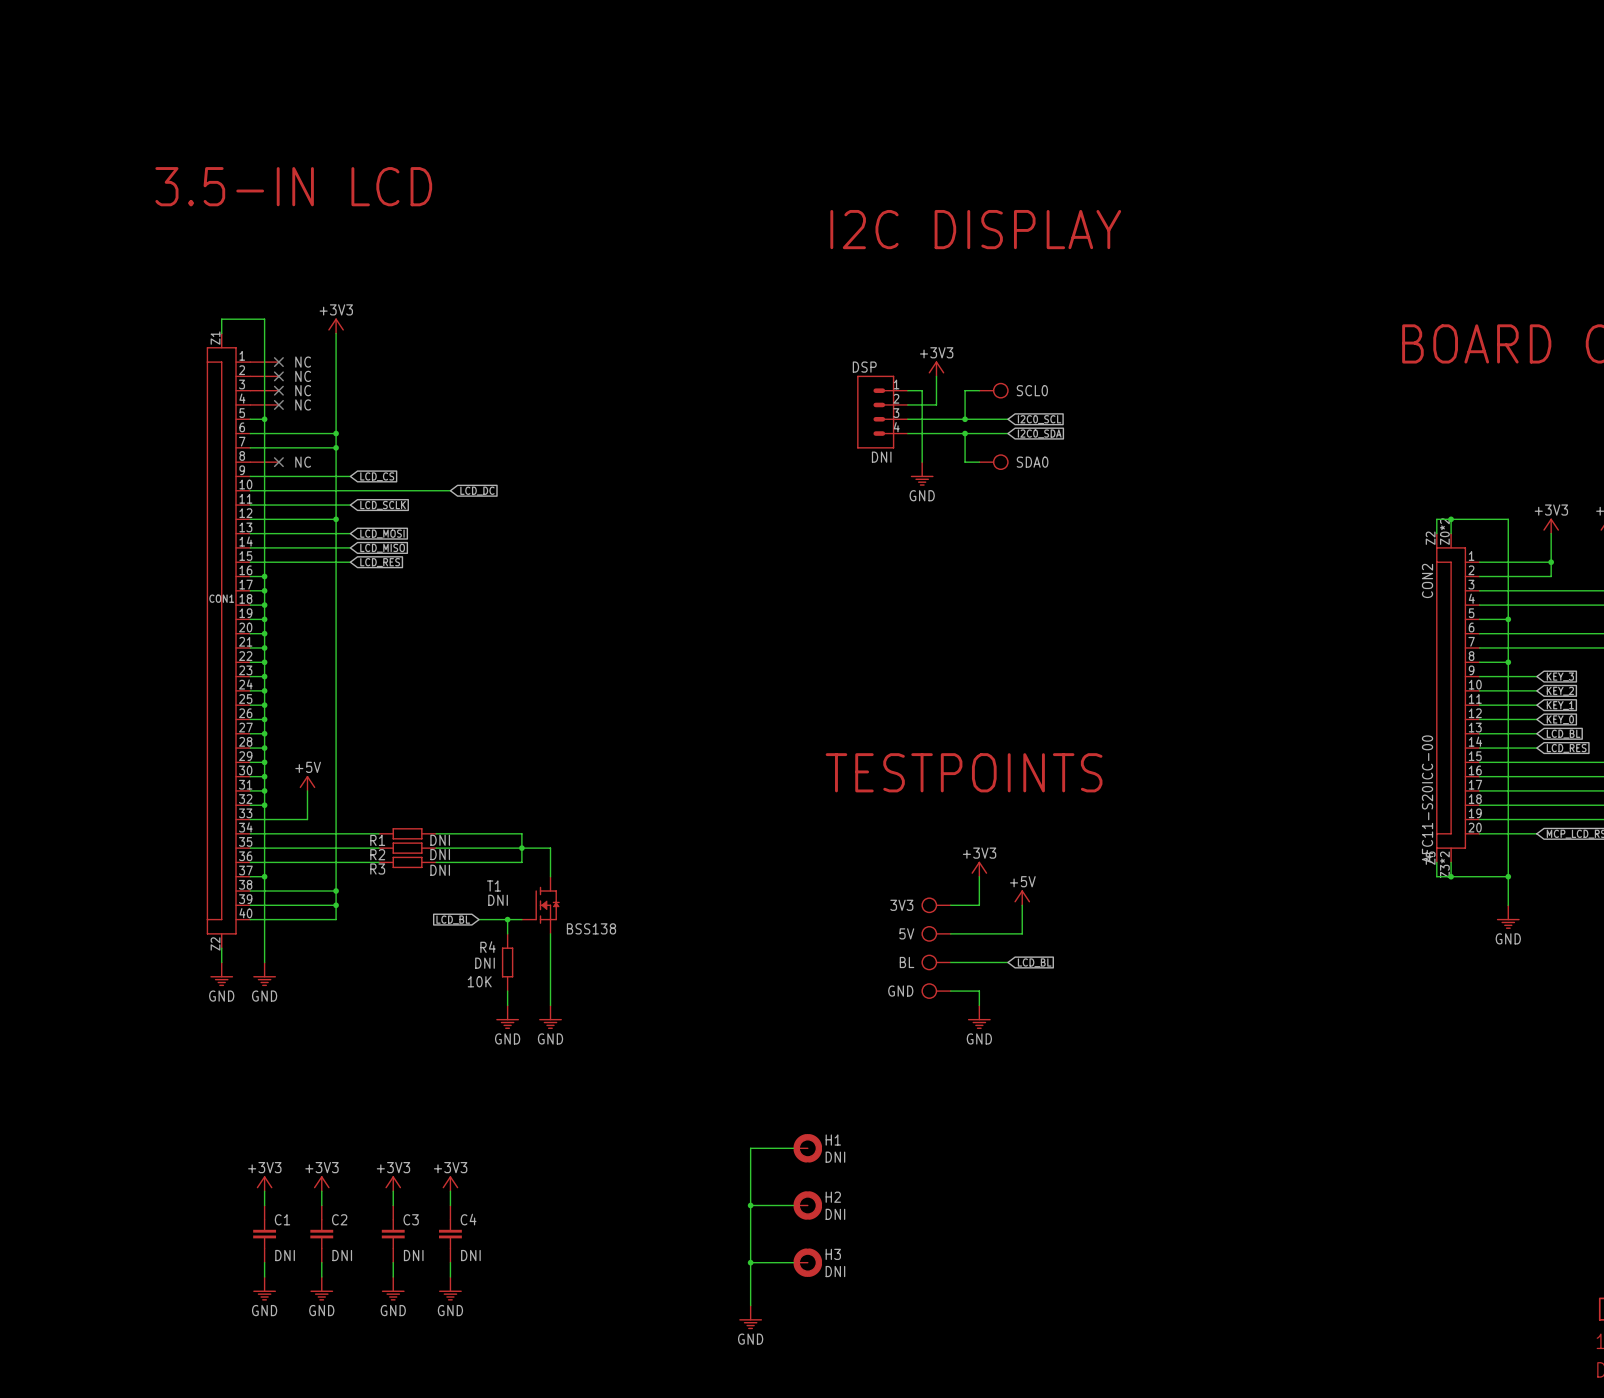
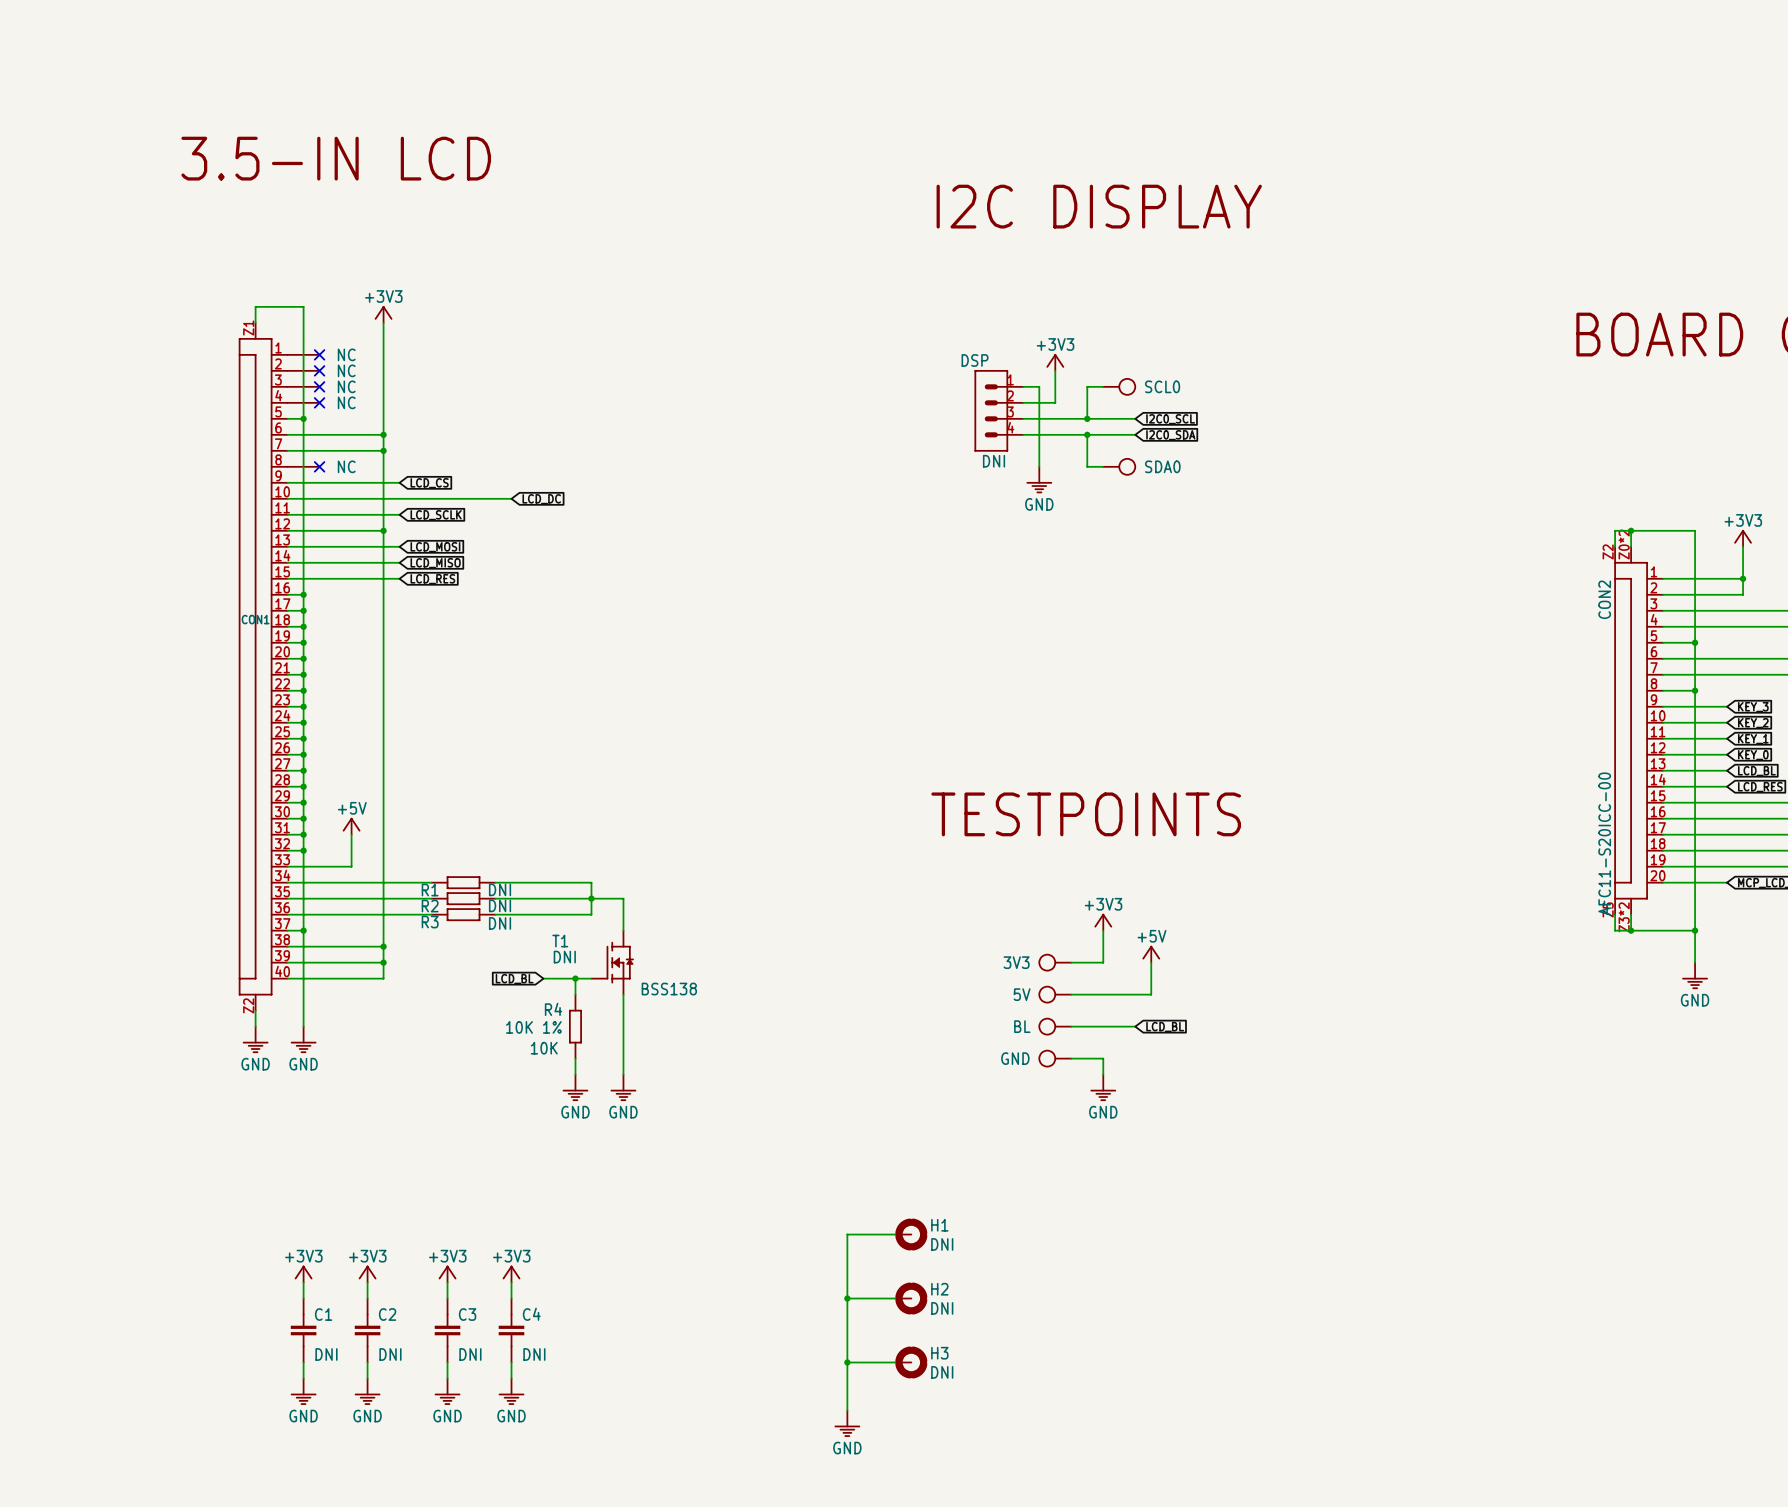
DSP symbol: [857, 375, 908, 449] -> [974, 370, 1024, 452]
R4 value: DNI (485, 963) -> 10K 1% (533, 1027)

